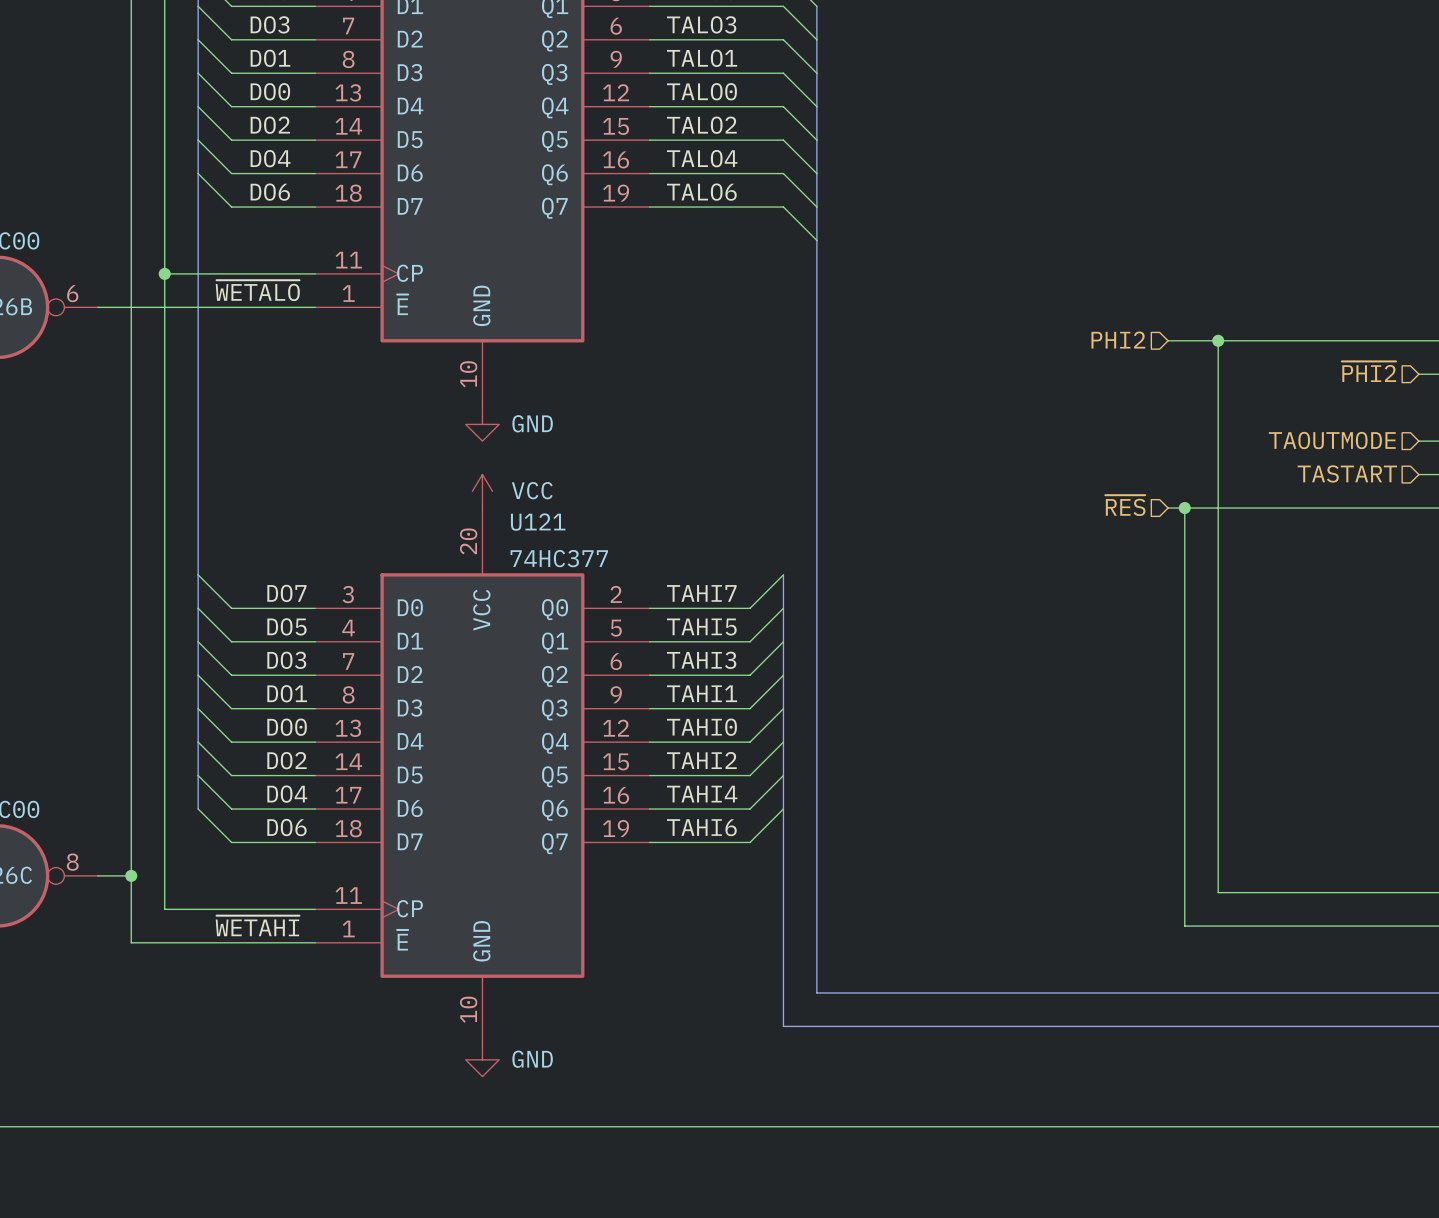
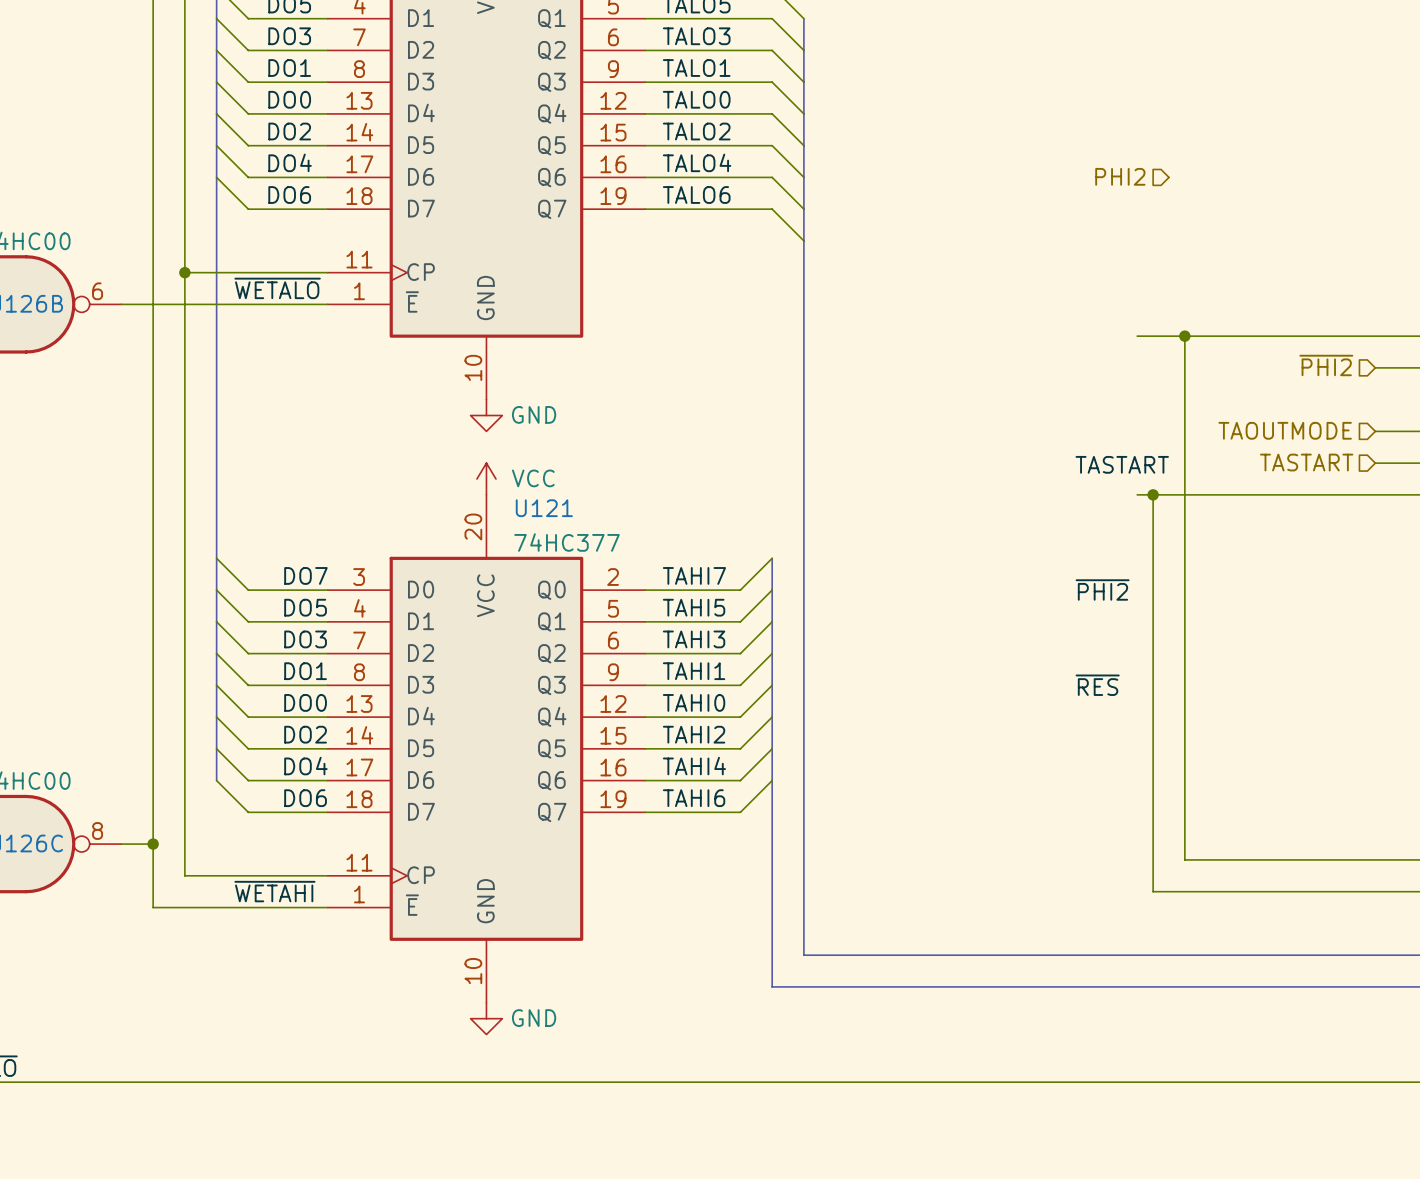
hierarchical label position: PHI2 (1118, 340) -> PHI2 (1120, 176)
label: none -> TASTART (1122, 464)
hierarchical label: ~{RES} (1125, 505) -> none
label: none -> ~{PHI2} (1102, 589)
label: none -> ~{RES} (1097, 685)

